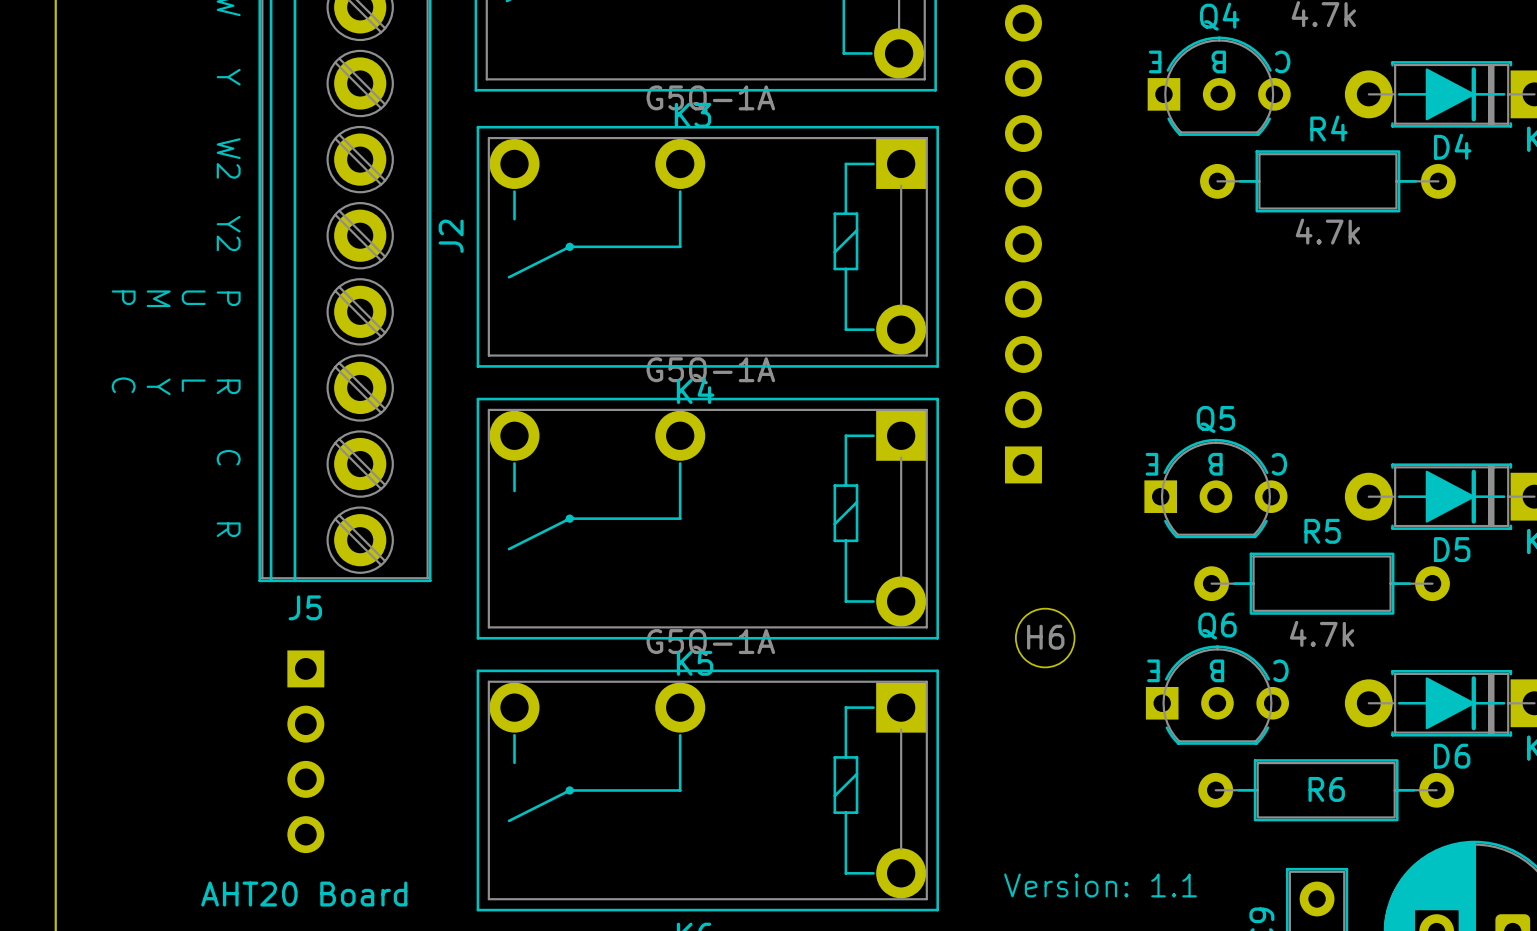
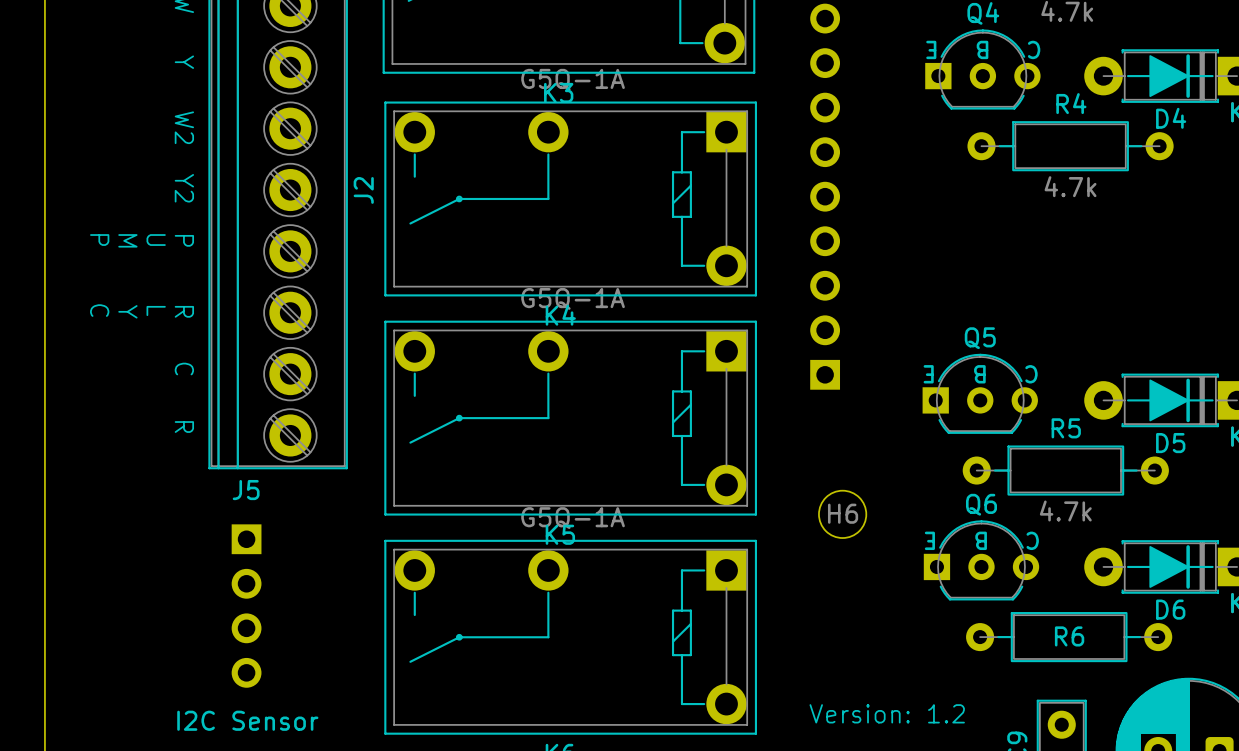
text: Version: 1.1 (1100, 885) -> Version: 1.2 (887, 713)
J5 value: AHT20 Board (304, 894) -> I2C Sensor (247, 720)

